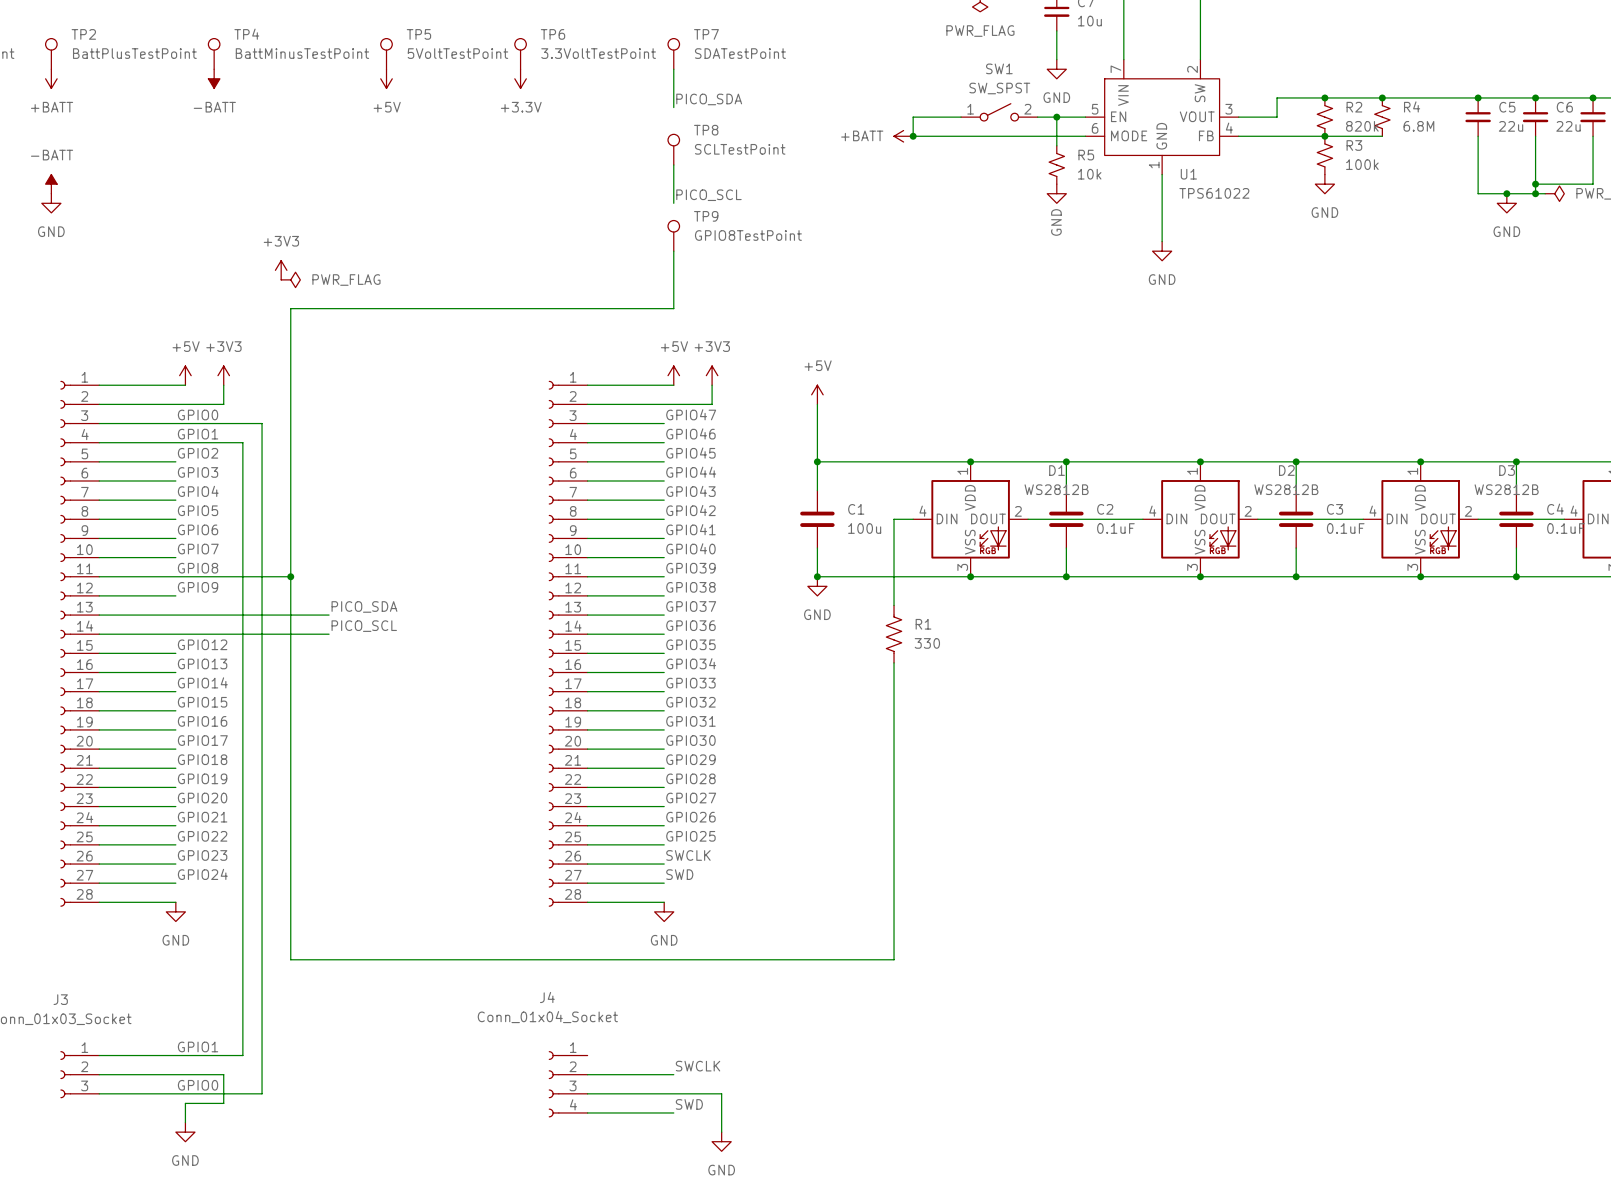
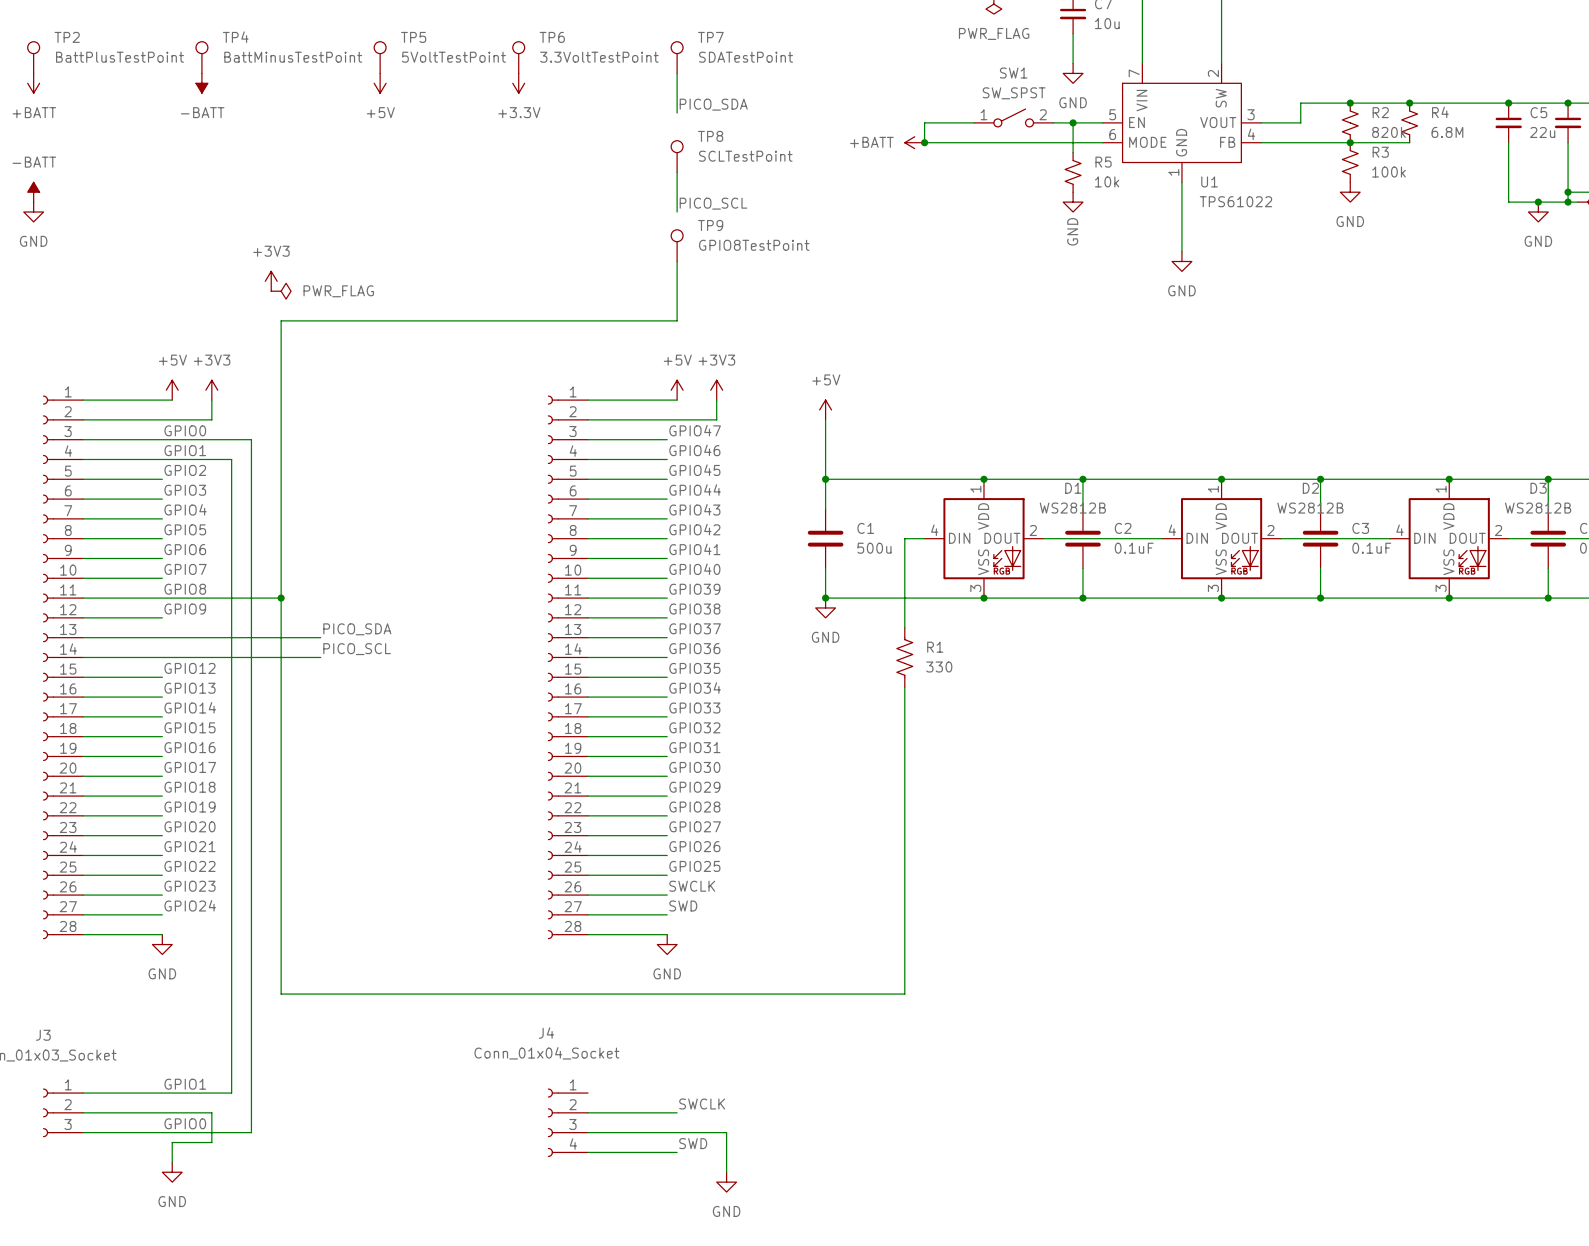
C1 value: 100u (864, 528) -> 500u (874, 548)

